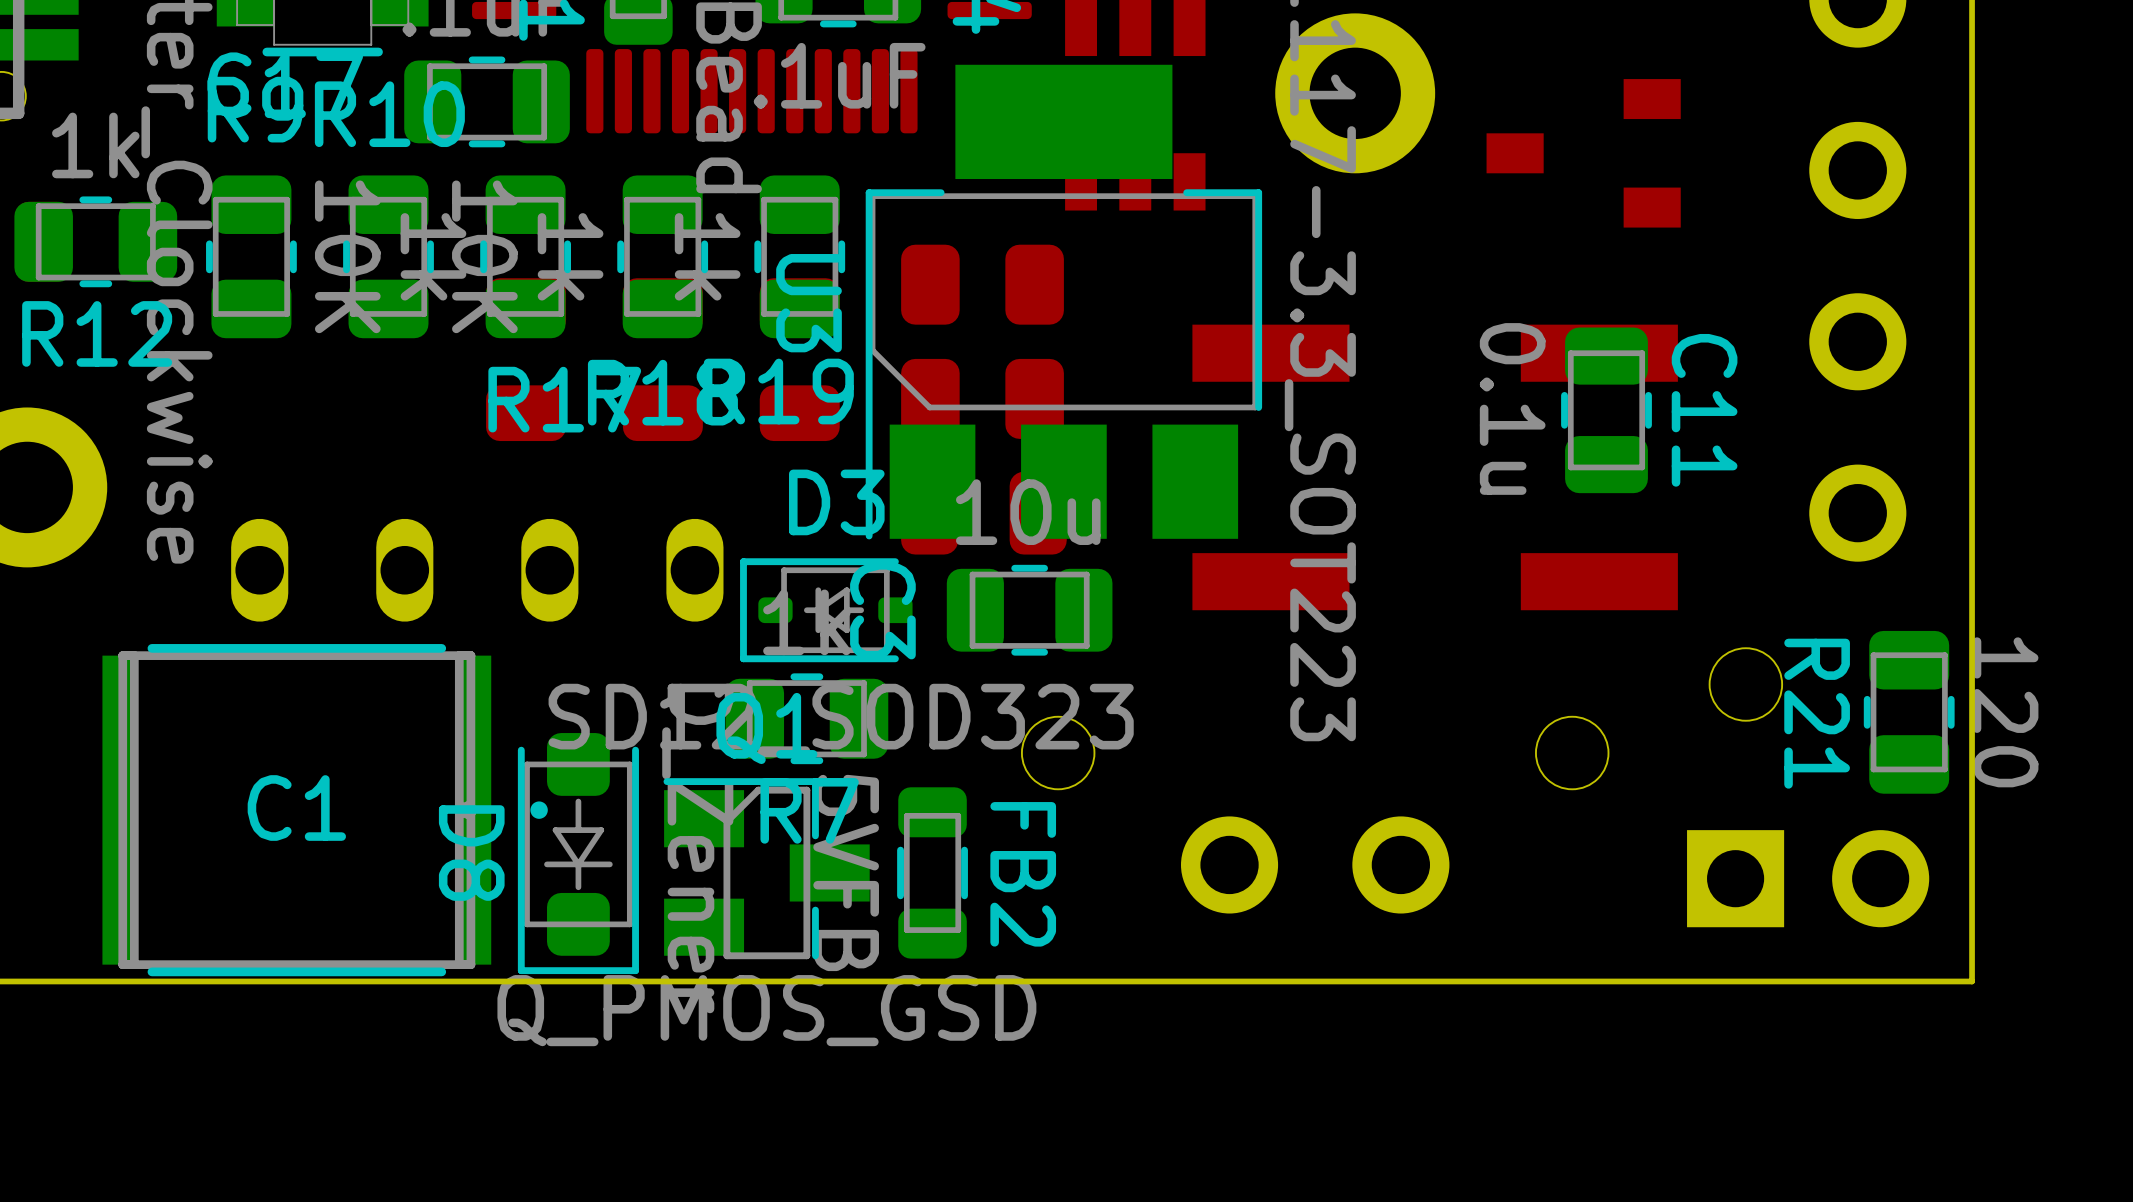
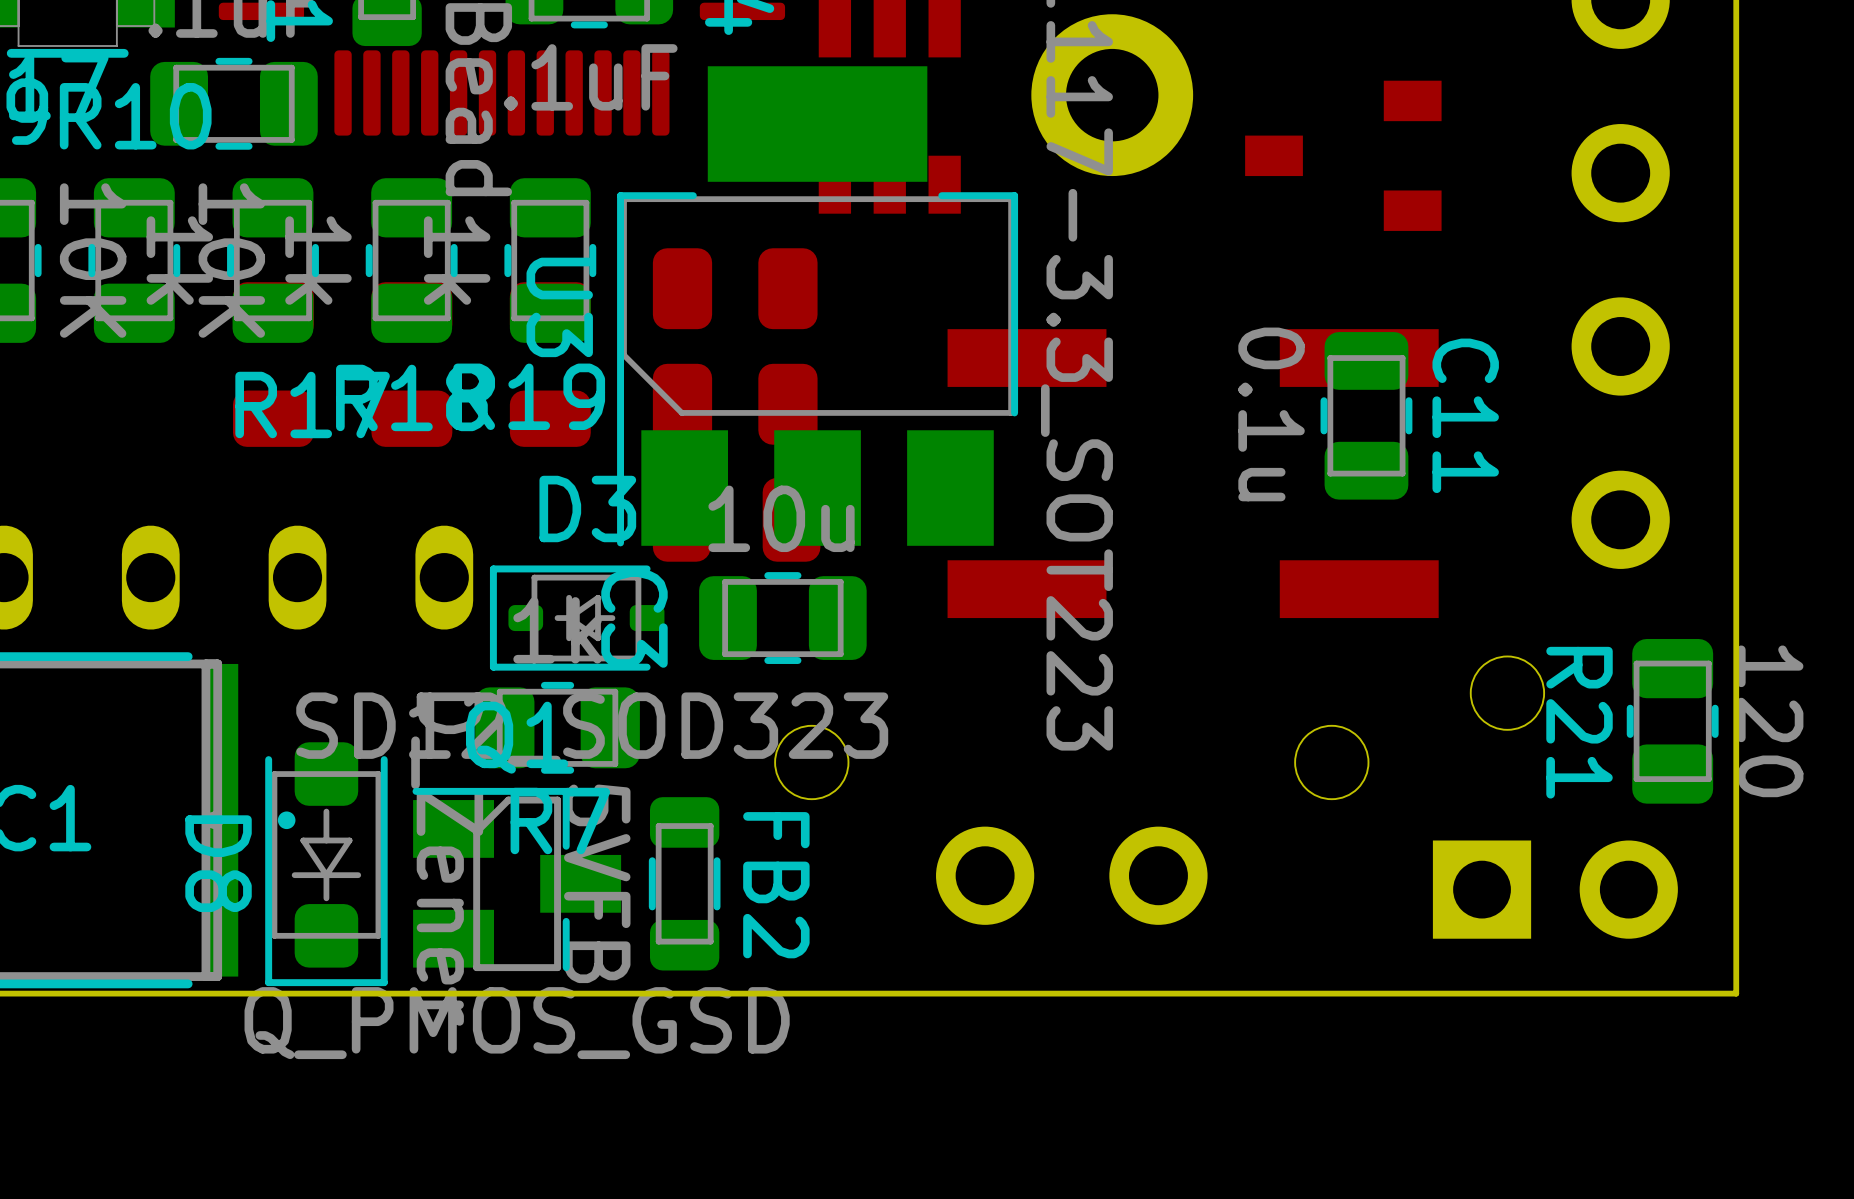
part position: (1808, 878) -> (1555, 889)

